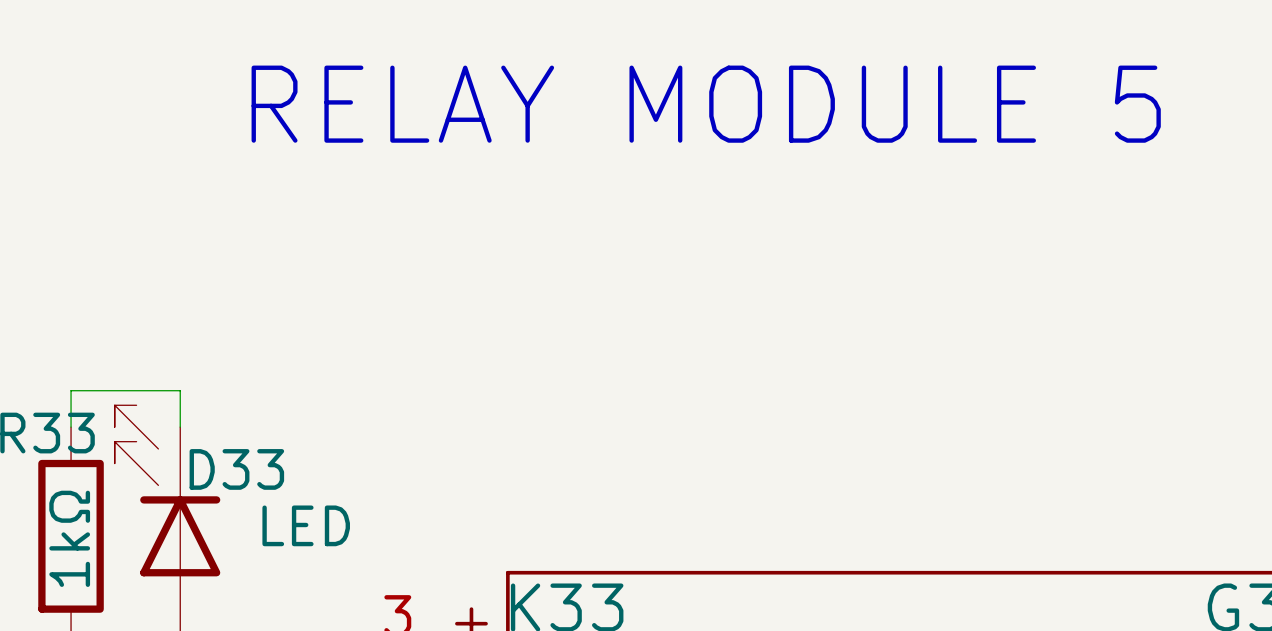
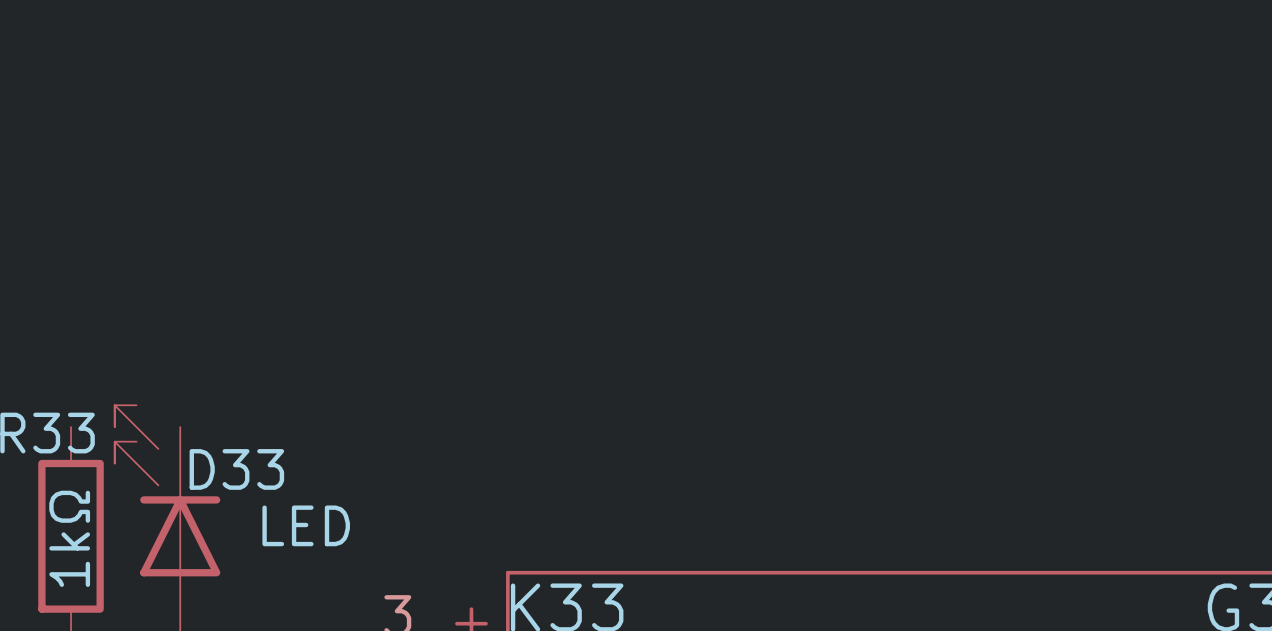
text: RELAY MODULE 5 (706, 104) -> none
wire: (71, 427) (71, 390) (180, 390) (180, 427) -> none

